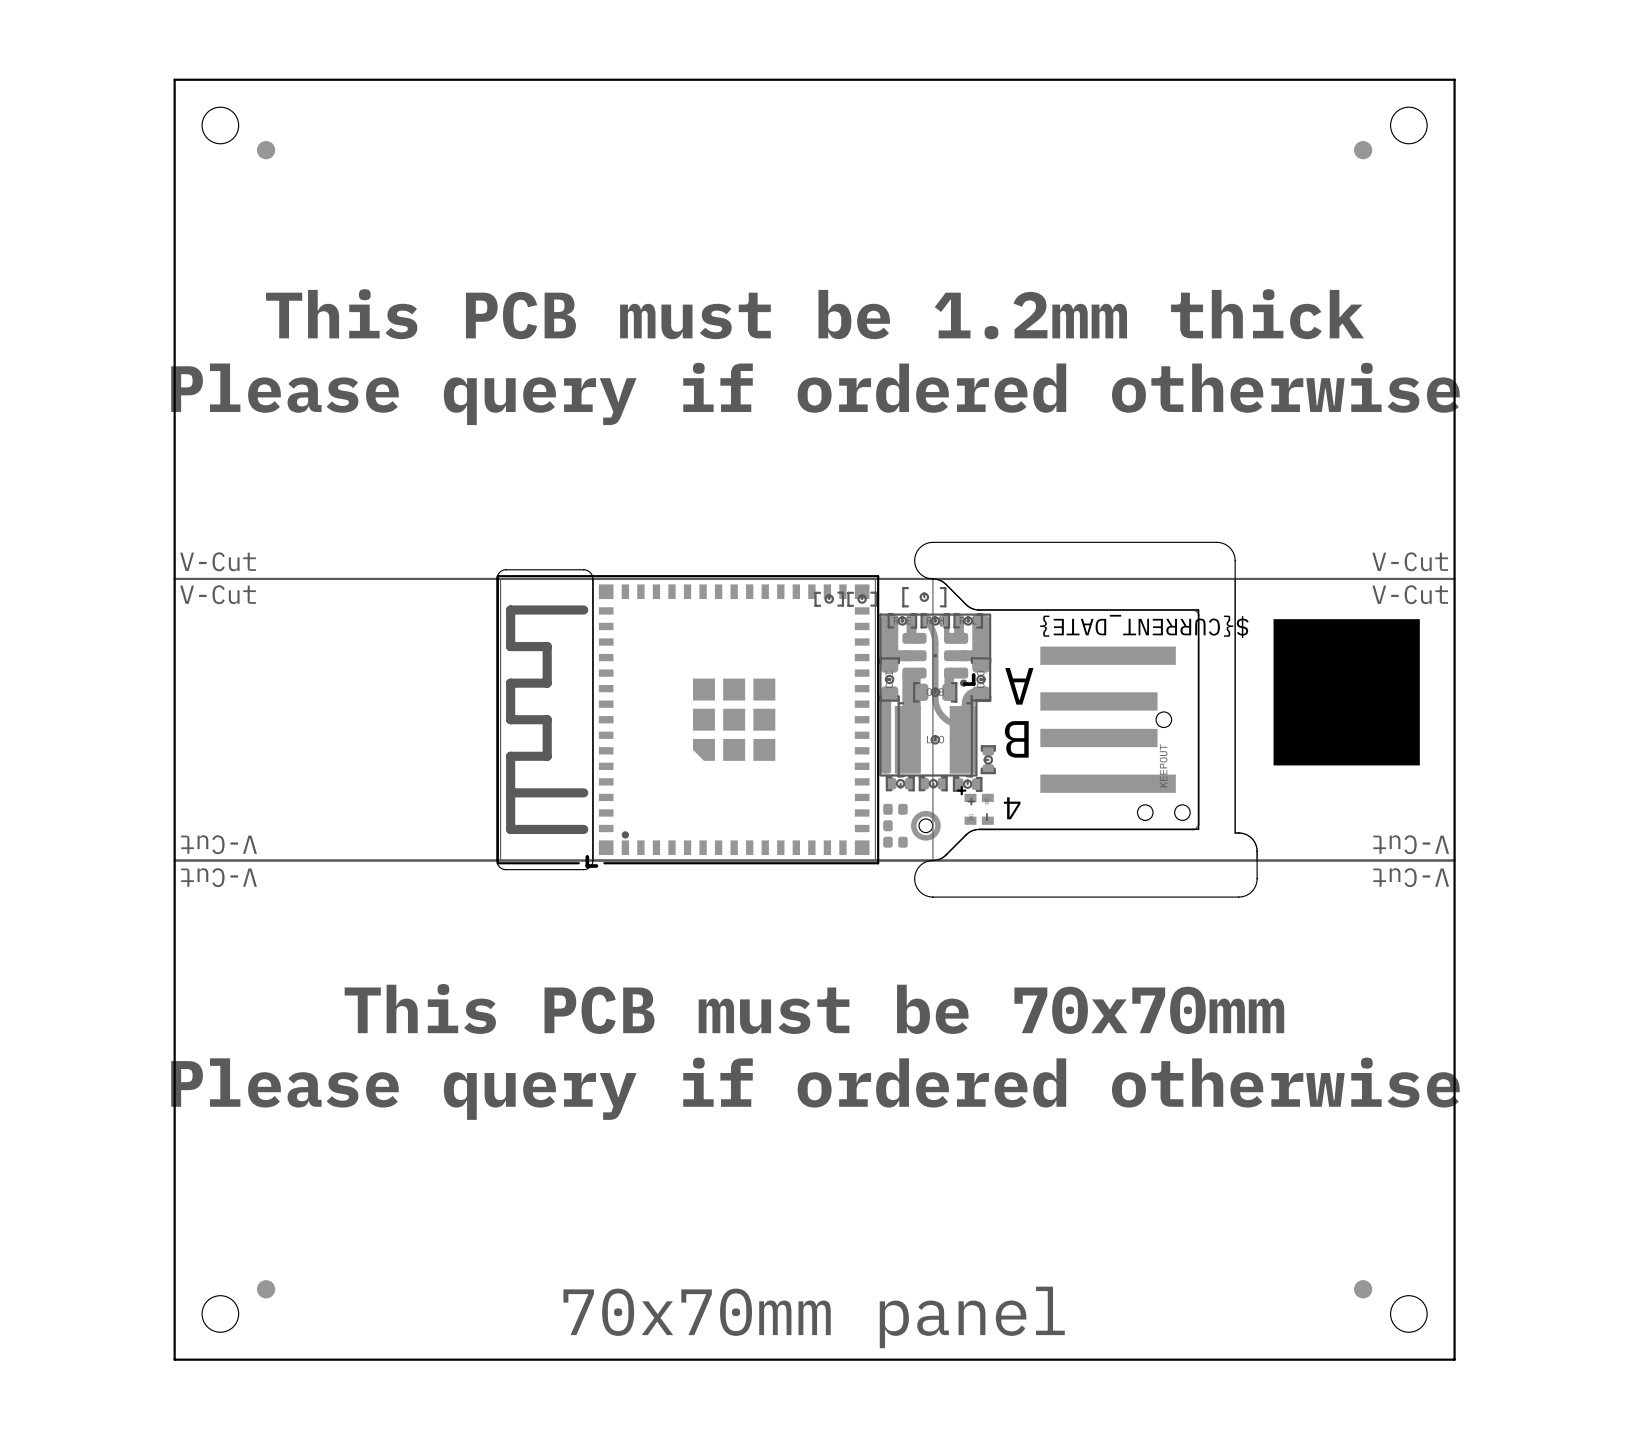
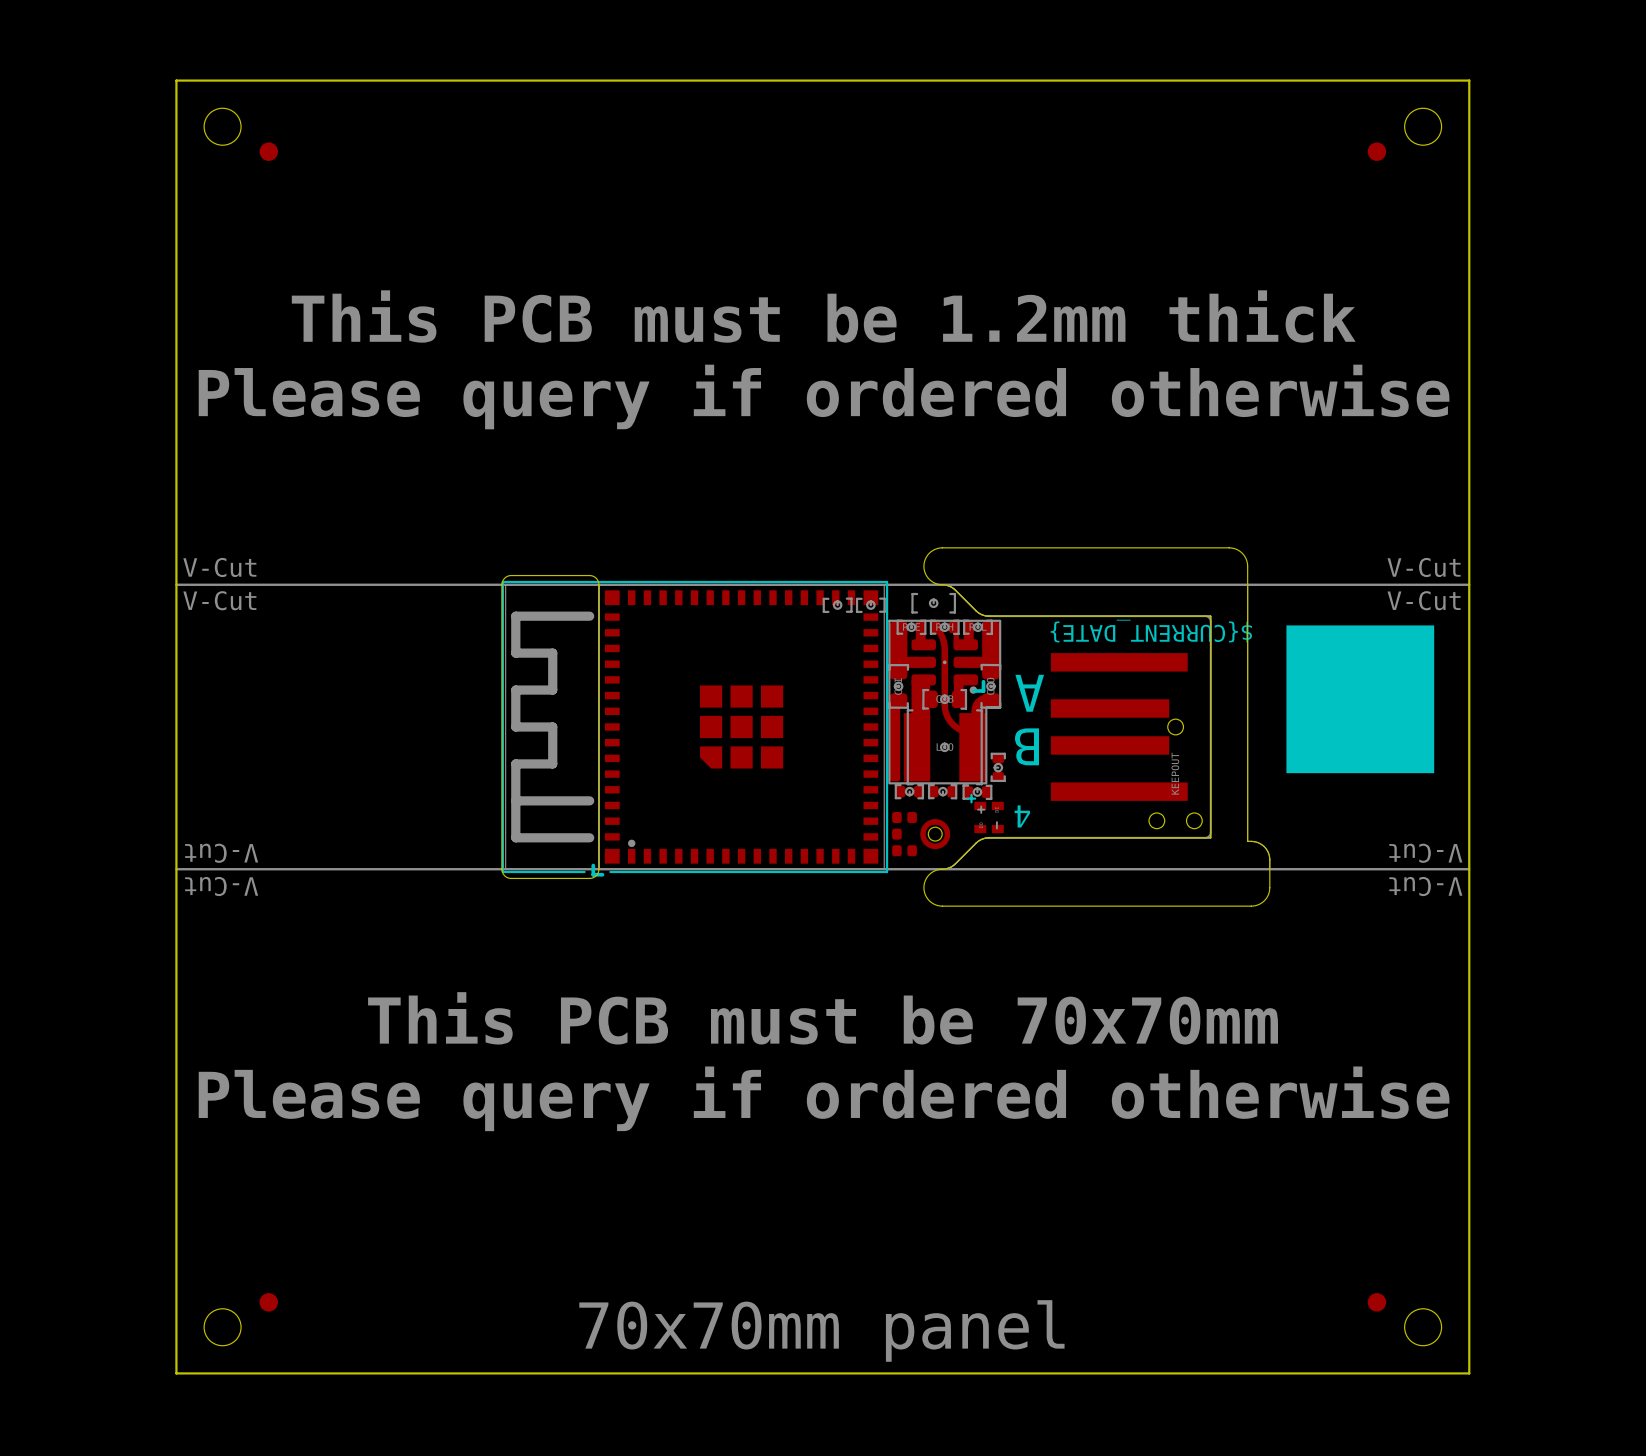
line: (932, 578) (932, 860) -> none

